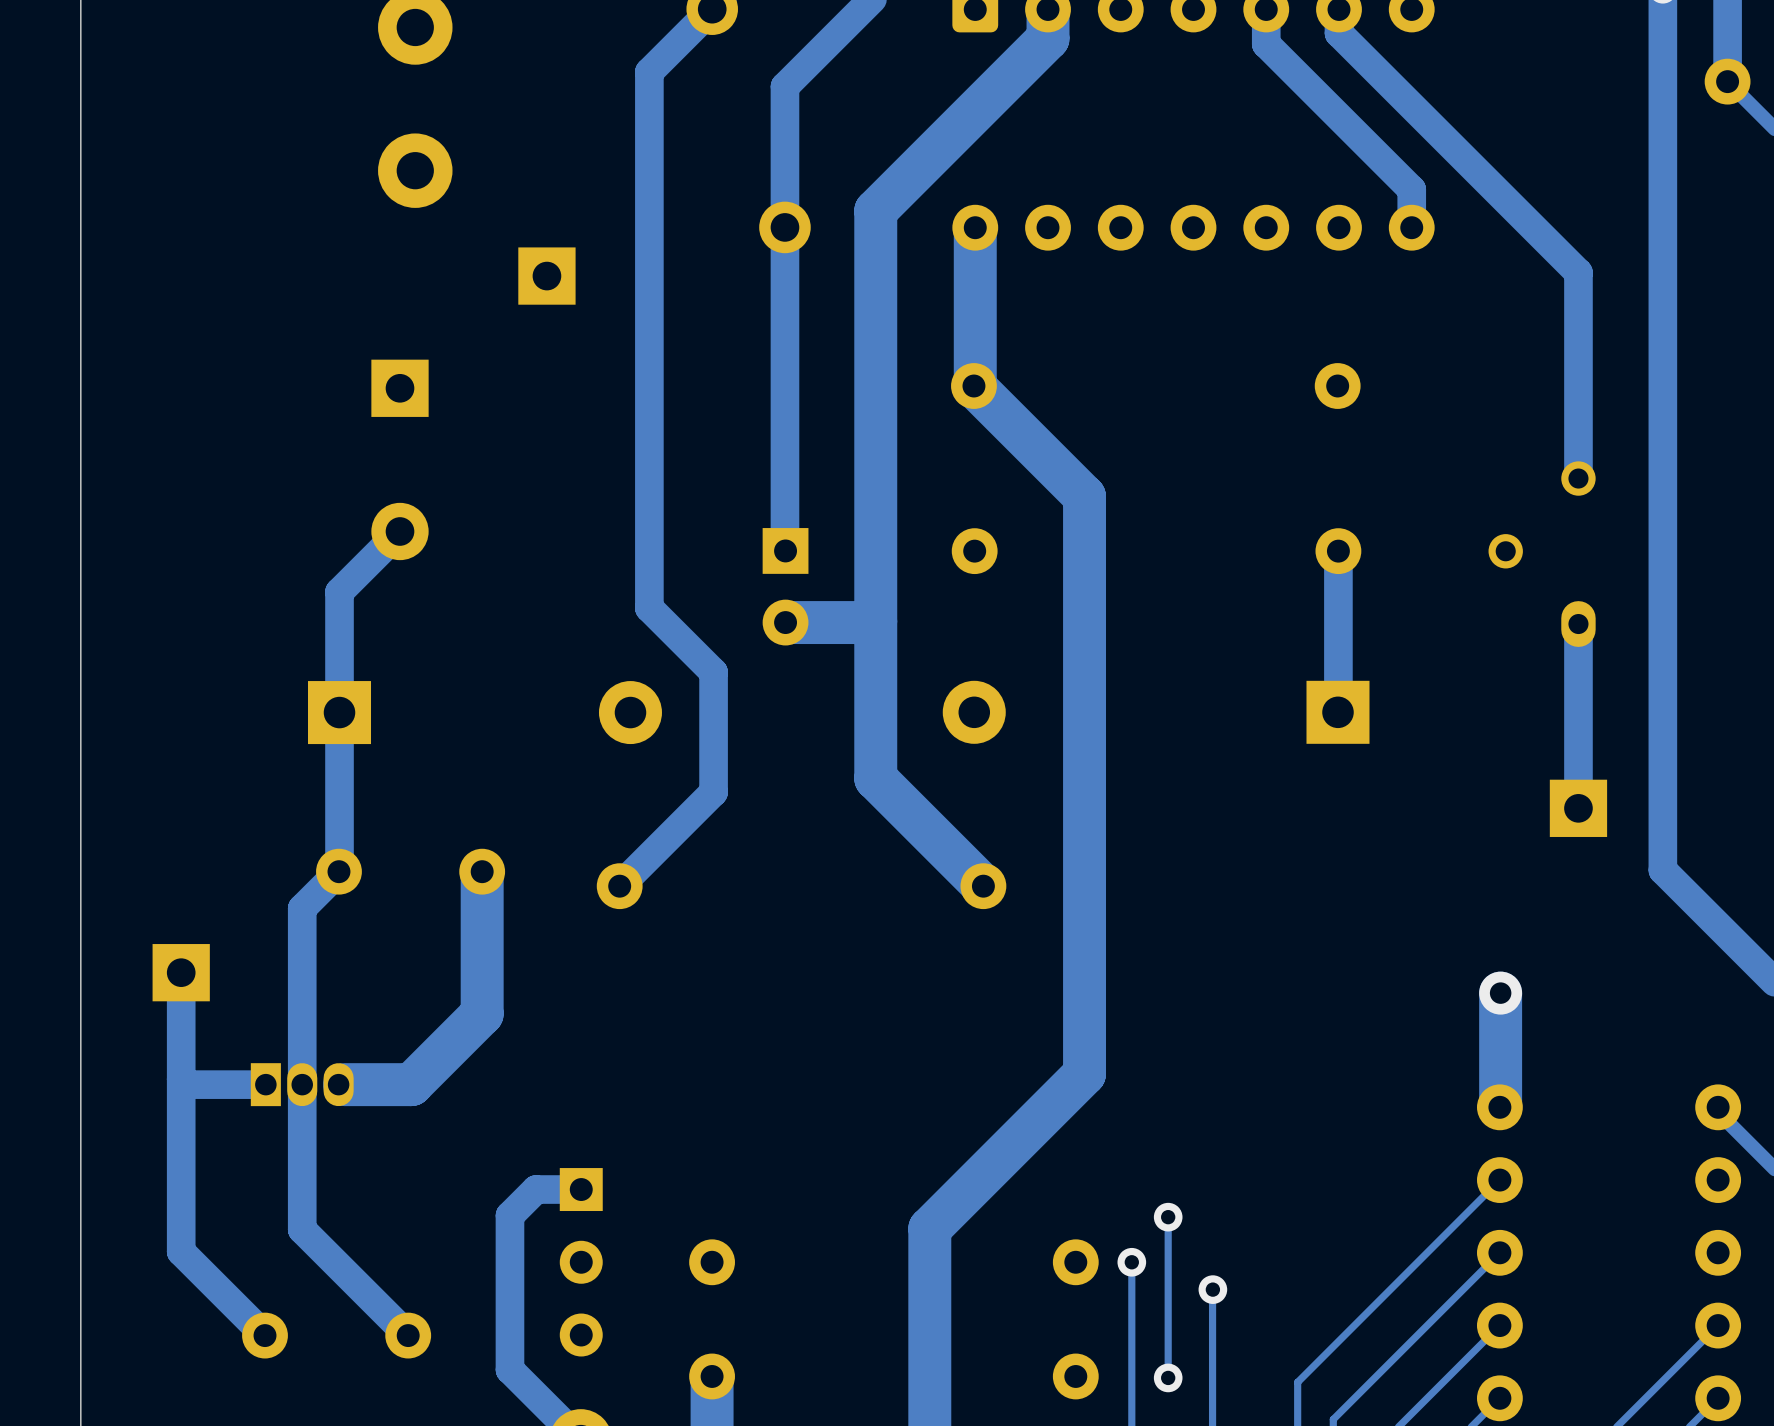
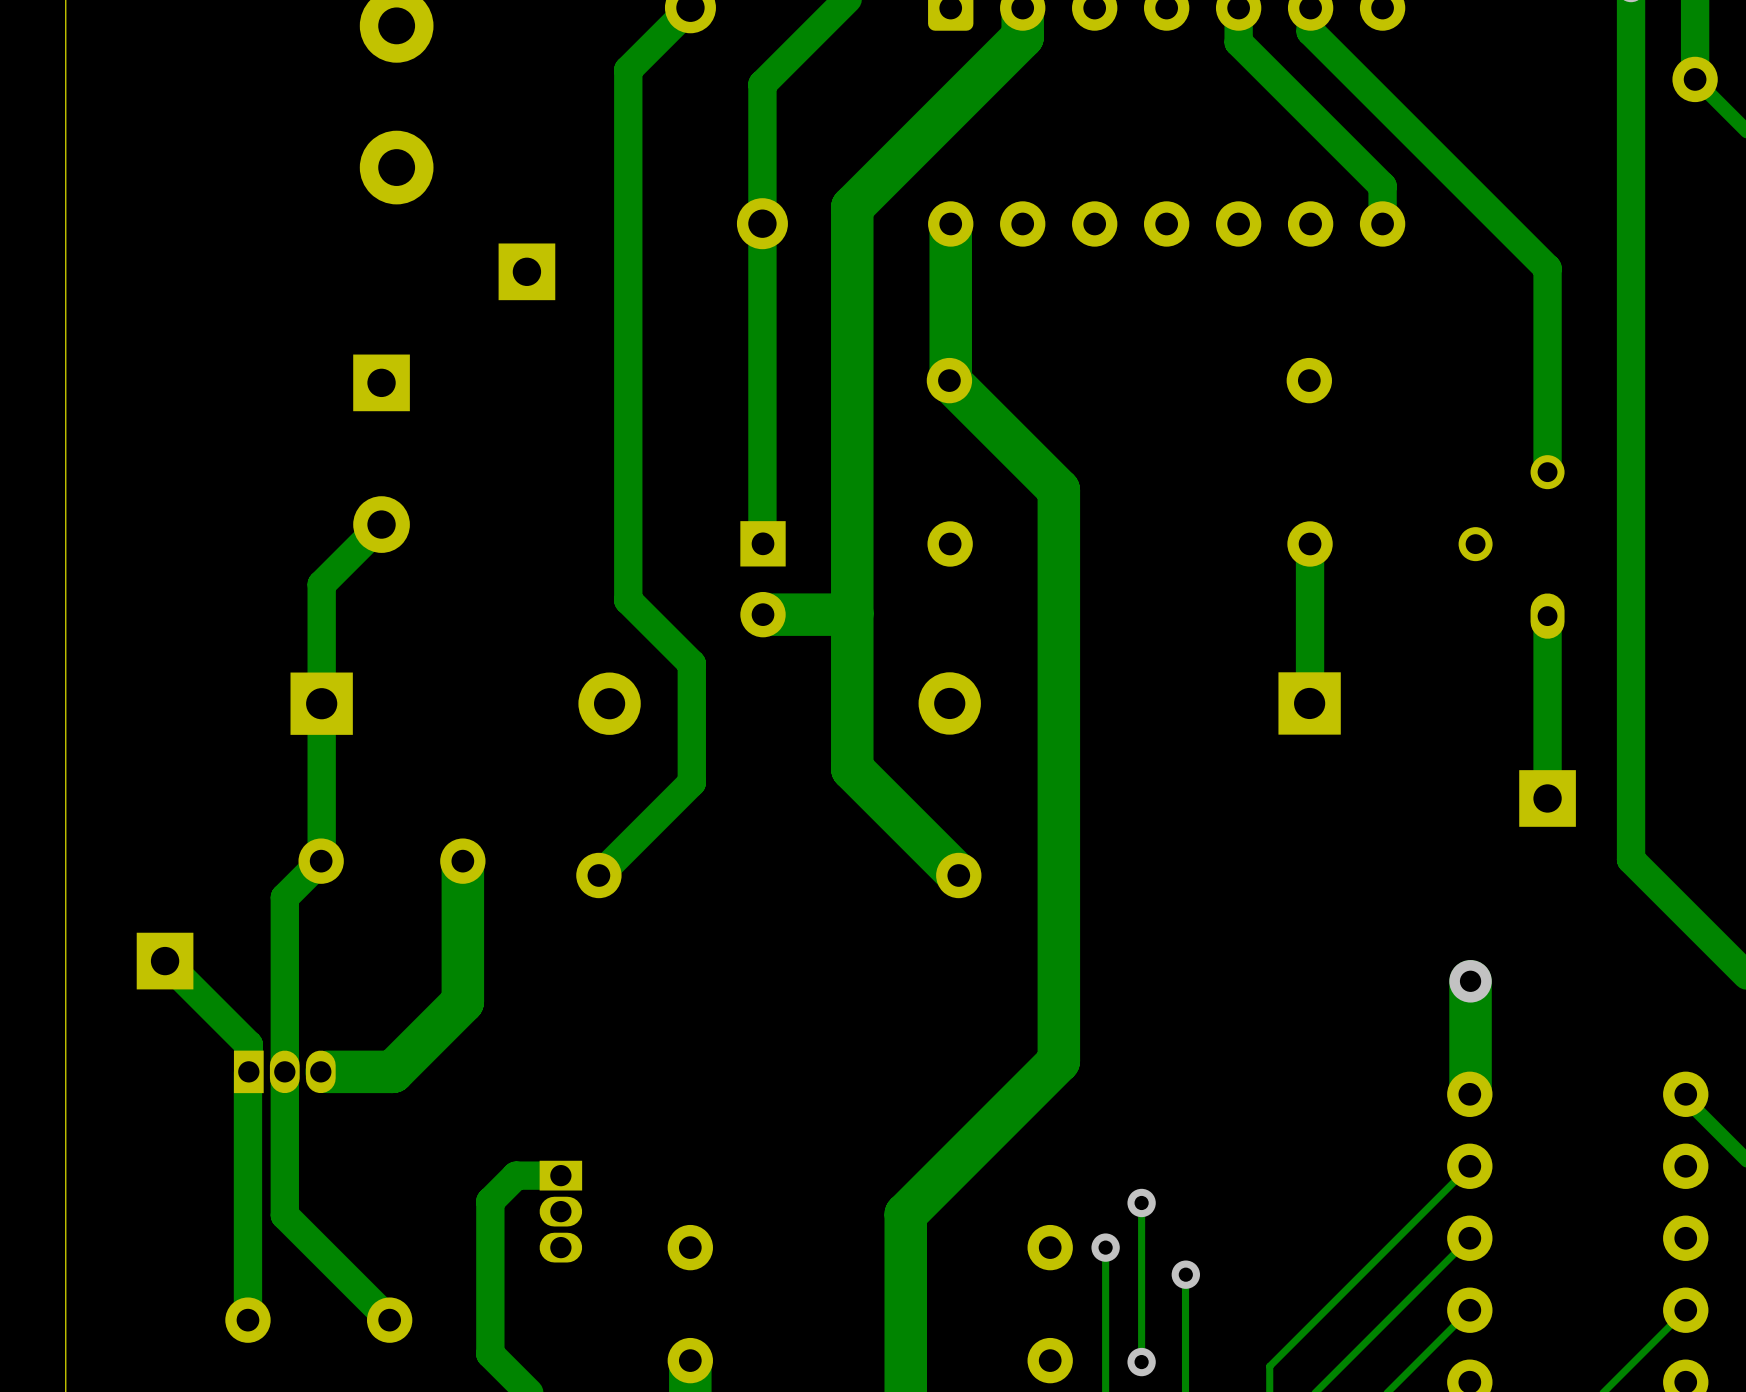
track: (181, 972) (181, 1251) (265, 1335) -> (247, 1072) (247, 1320)
track: (181, 1079) (186, 1084) (265, 1084) -> (165, 961) (248, 1044) (248, 1071)
part: none -> (560, 1211)
part: (581, 1262) -> none

